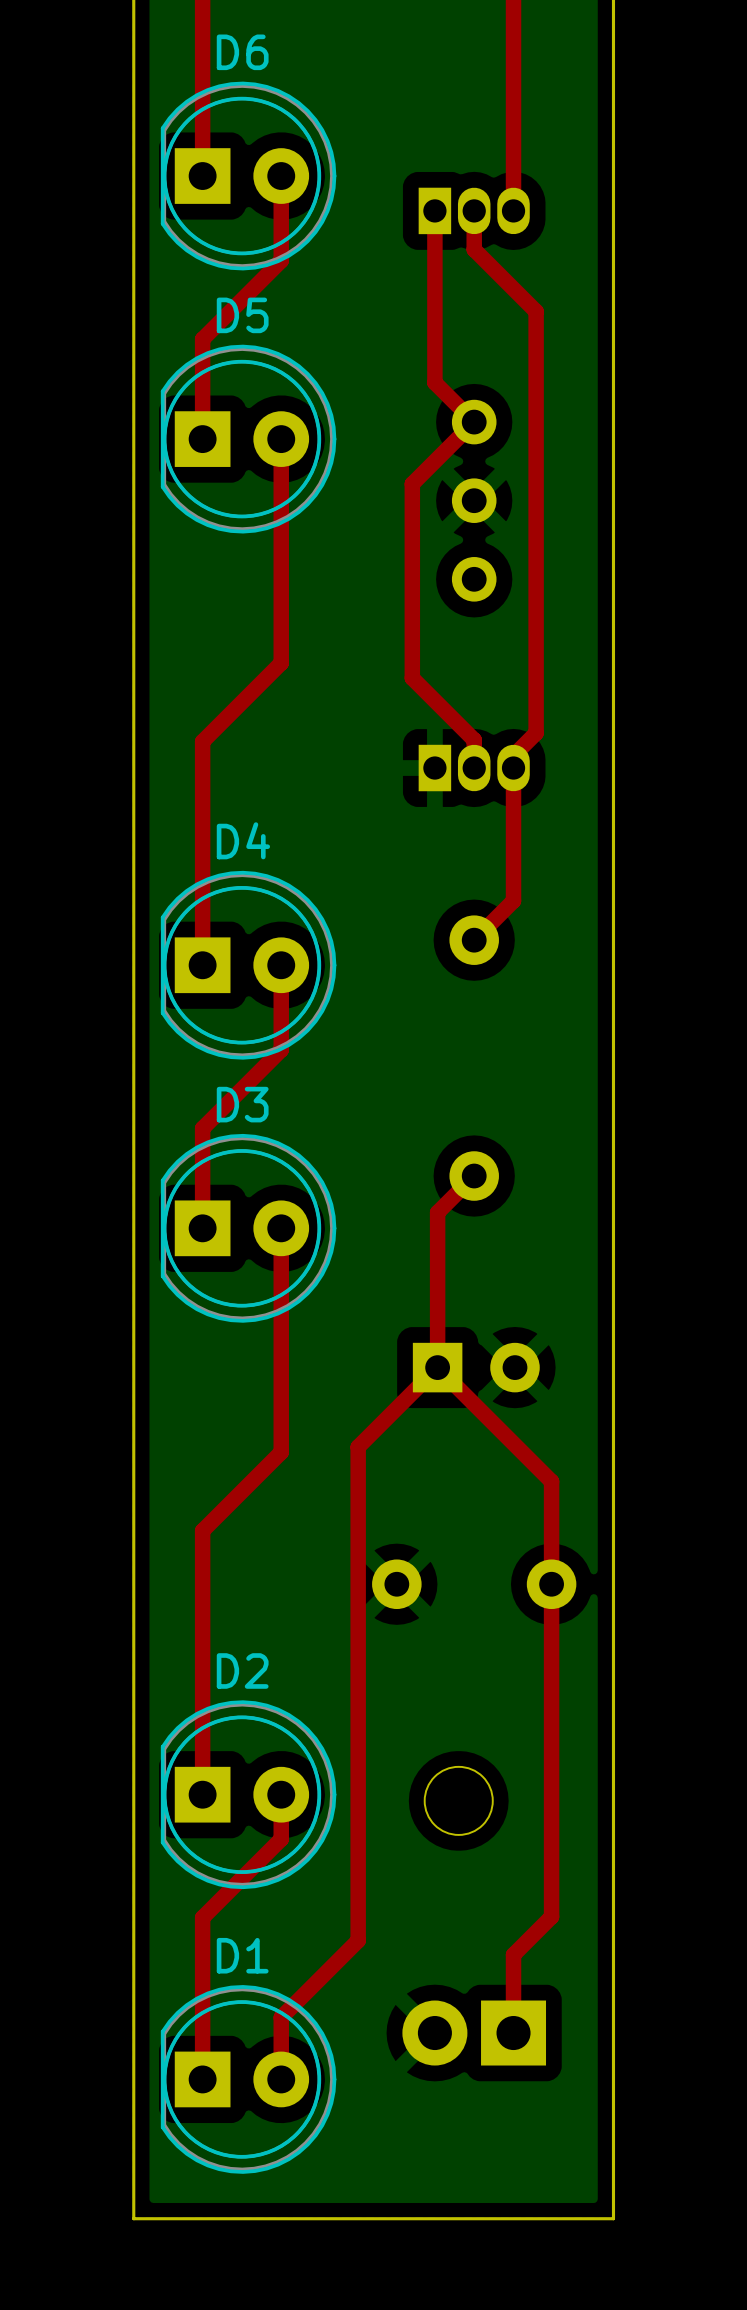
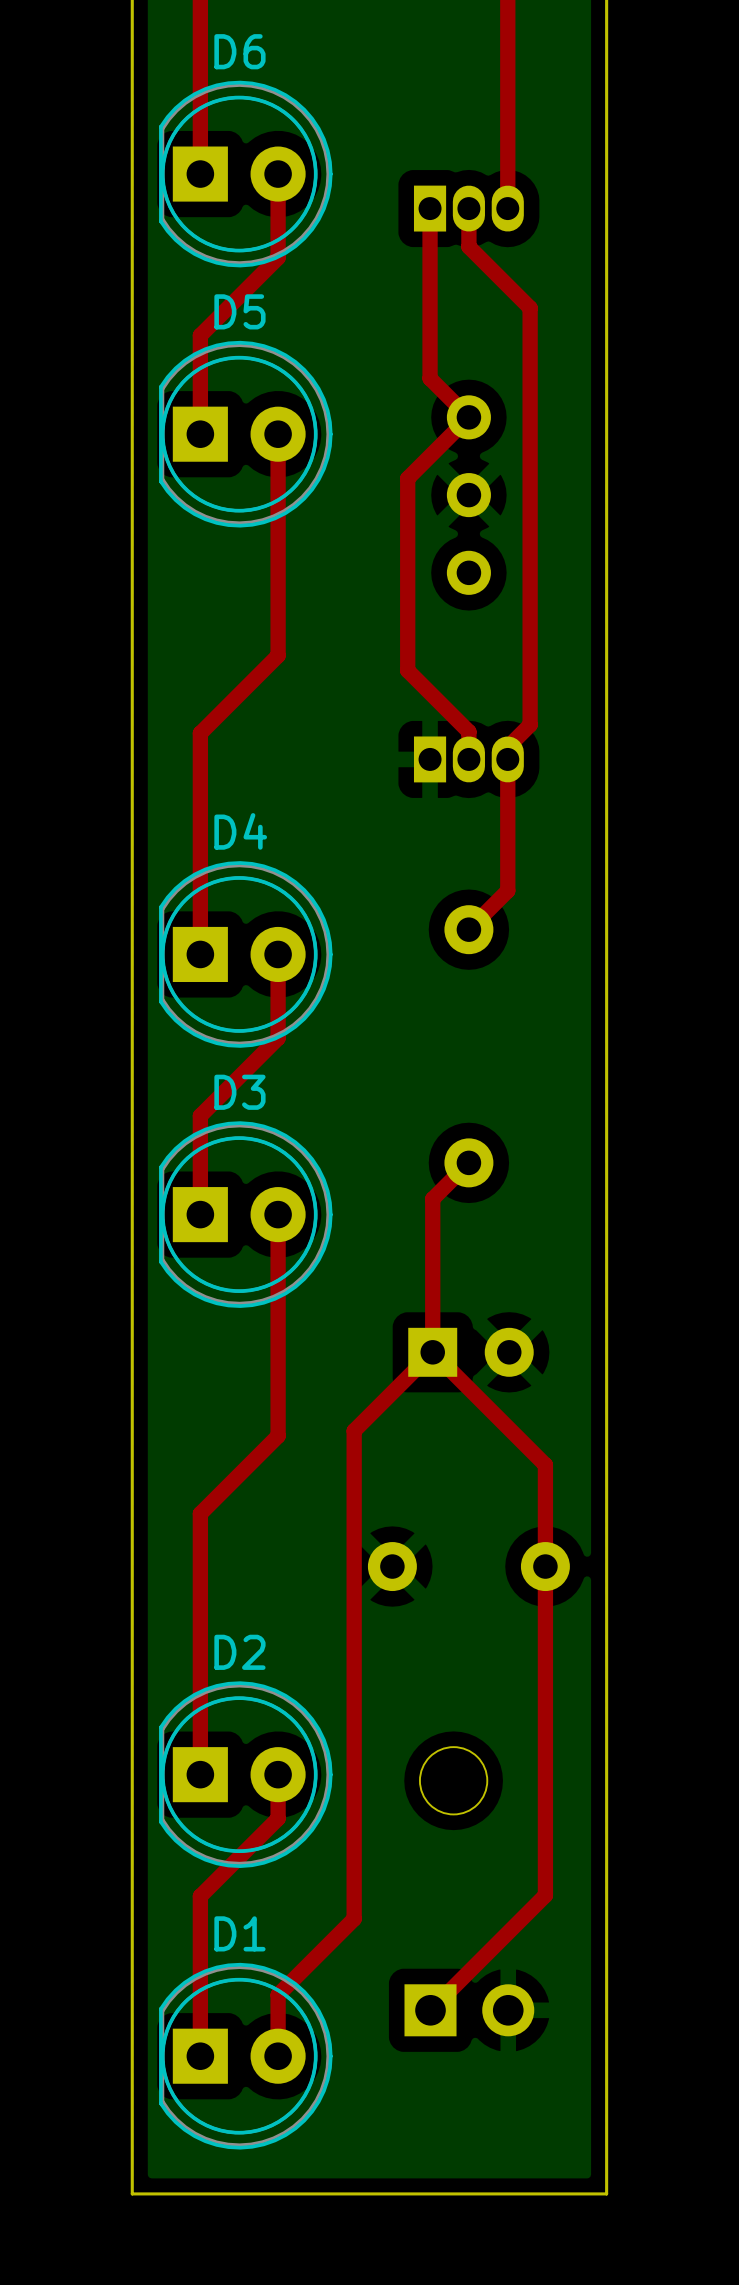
top track: (513, 1954) (513, 2033) -> (507, 1933) (430, 2010)
part footprint: [402, 2000, 547, 2066] -> [404, 1984, 535, 2037]

